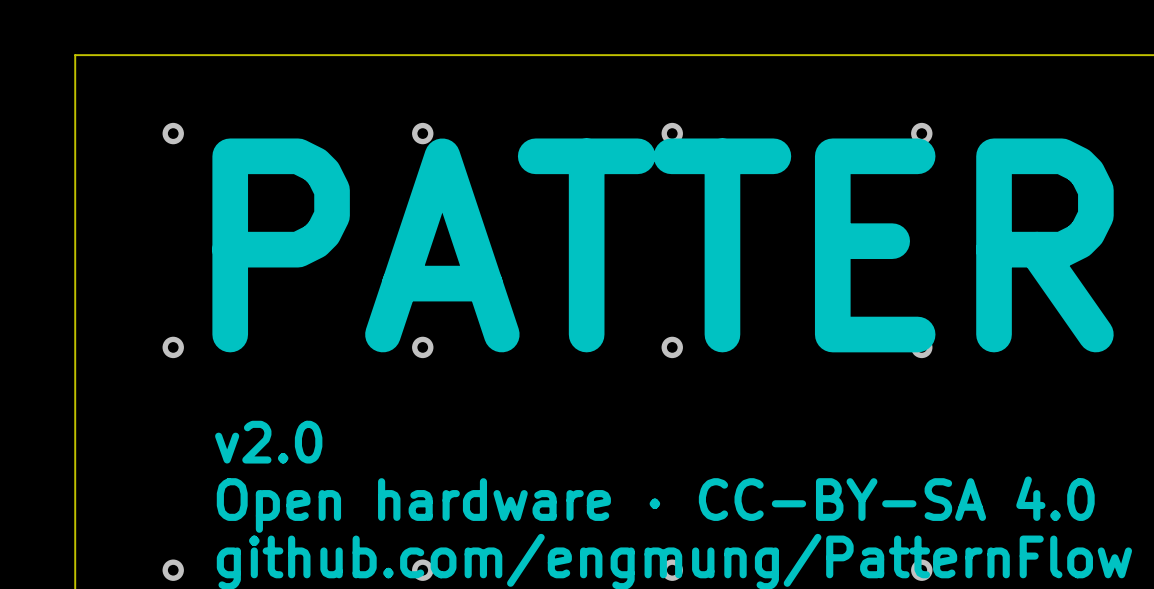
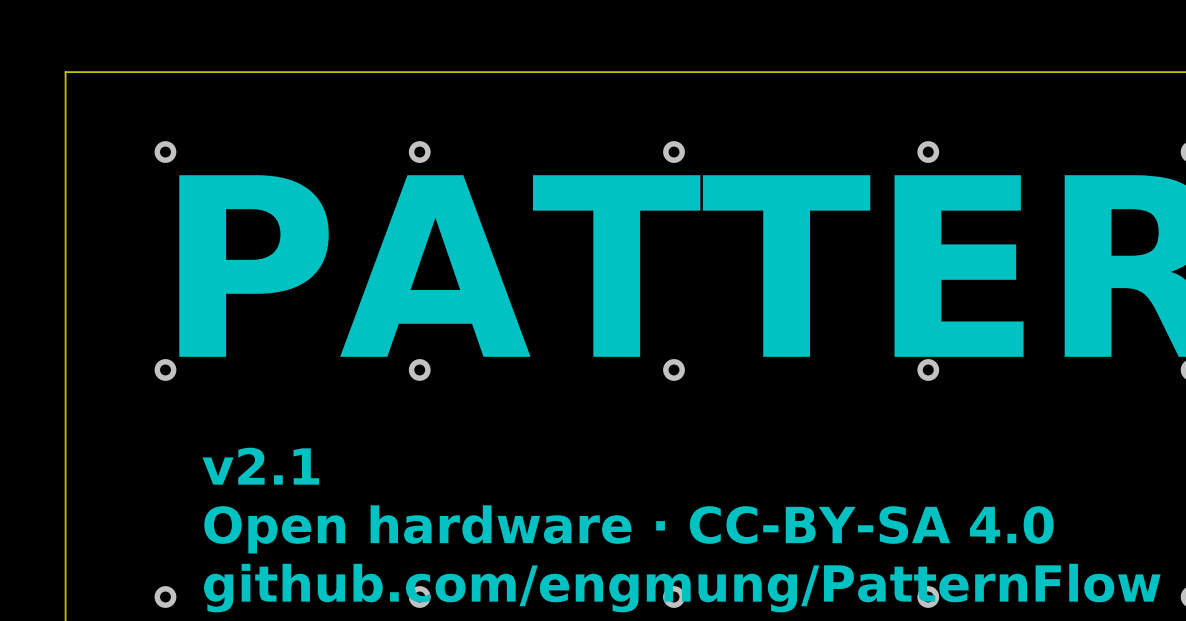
text: v2.0 (268, 442) -> v2.1 (260, 466)

